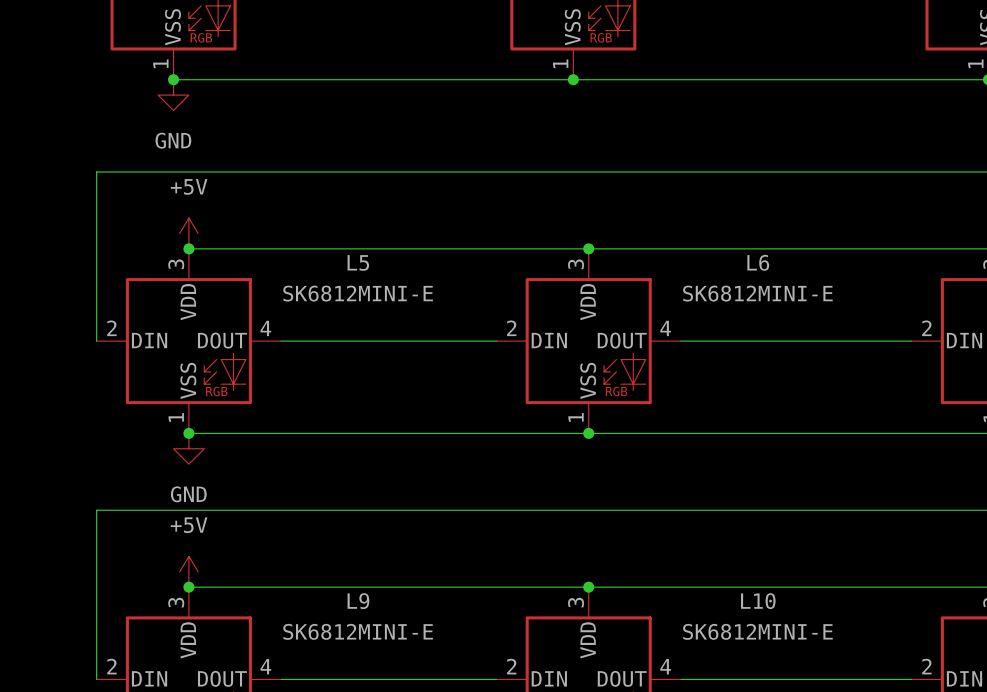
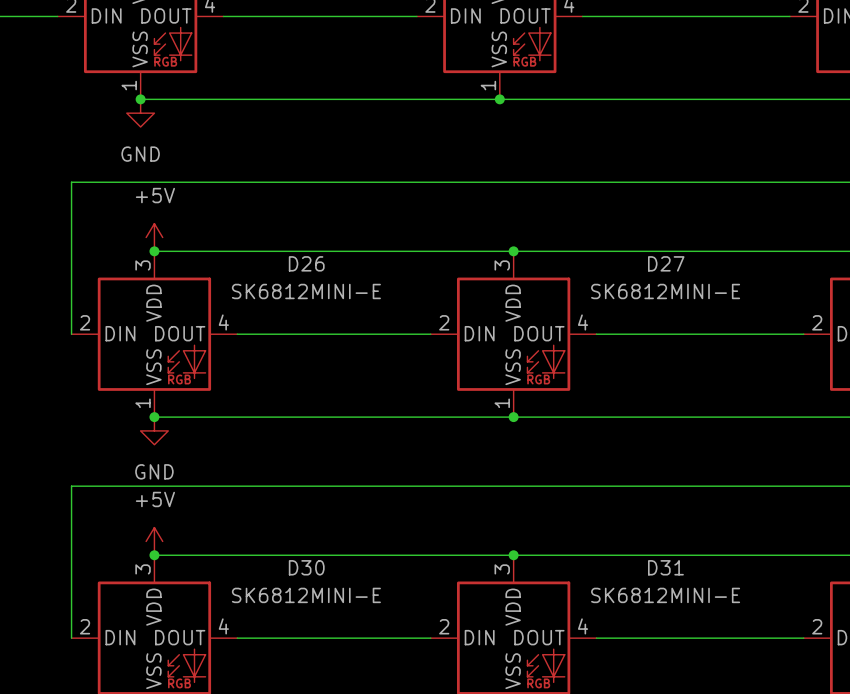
L5 name: L5 (358, 262) -> D26 (306, 263)
L6 name: L6 (758, 262) -> D27 (666, 263)
L9 name: L9 (358, 601) -> D30 (306, 567)
L10 name: L10 (758, 601) -> D31 (665, 567)

